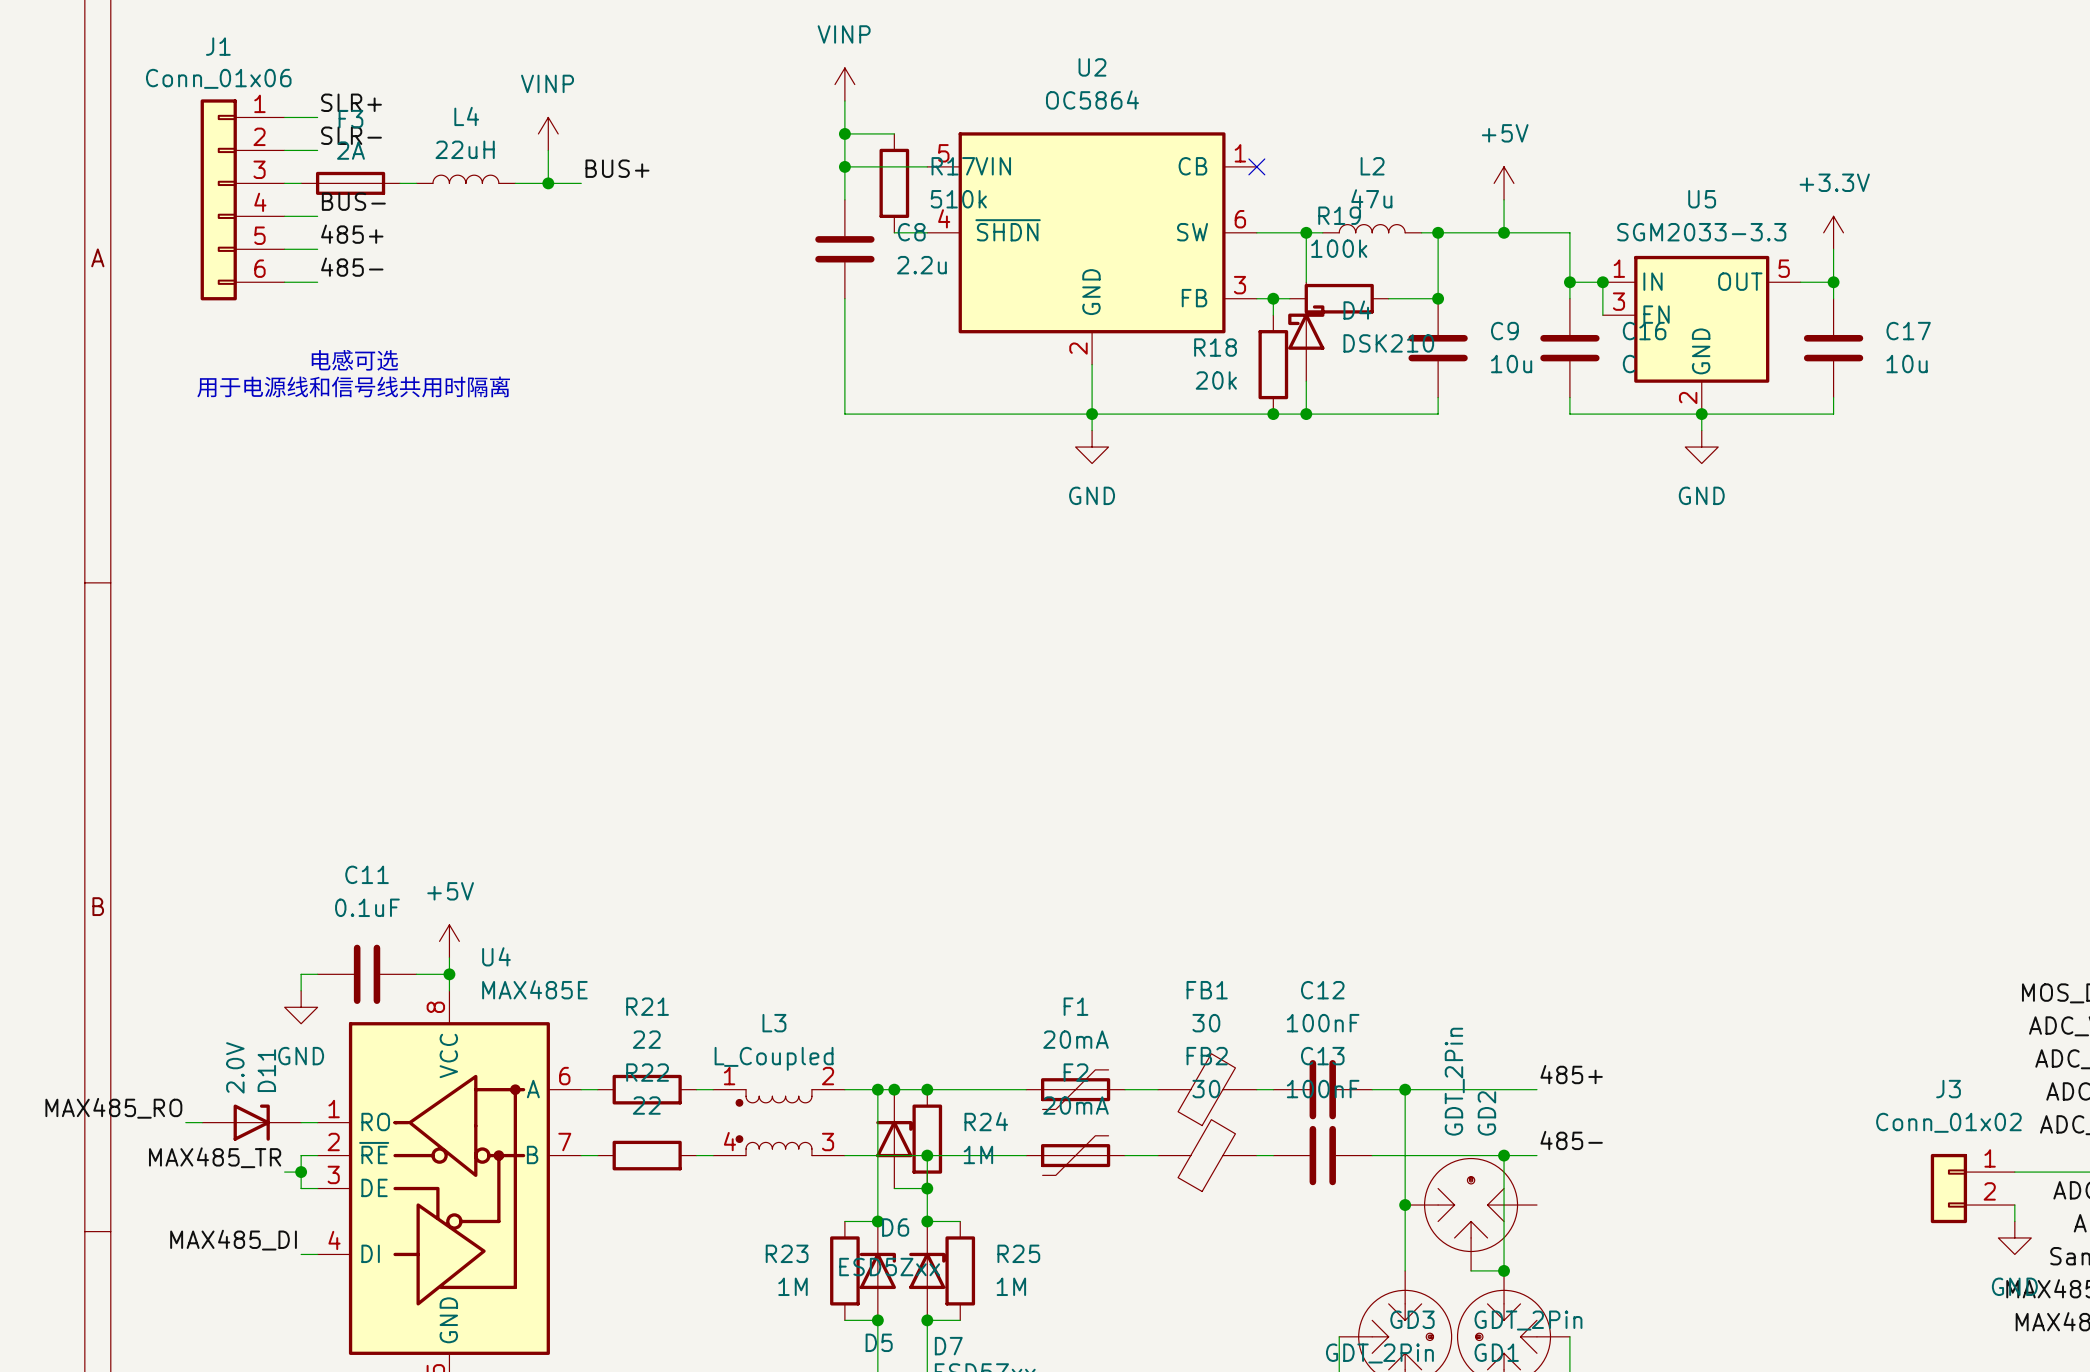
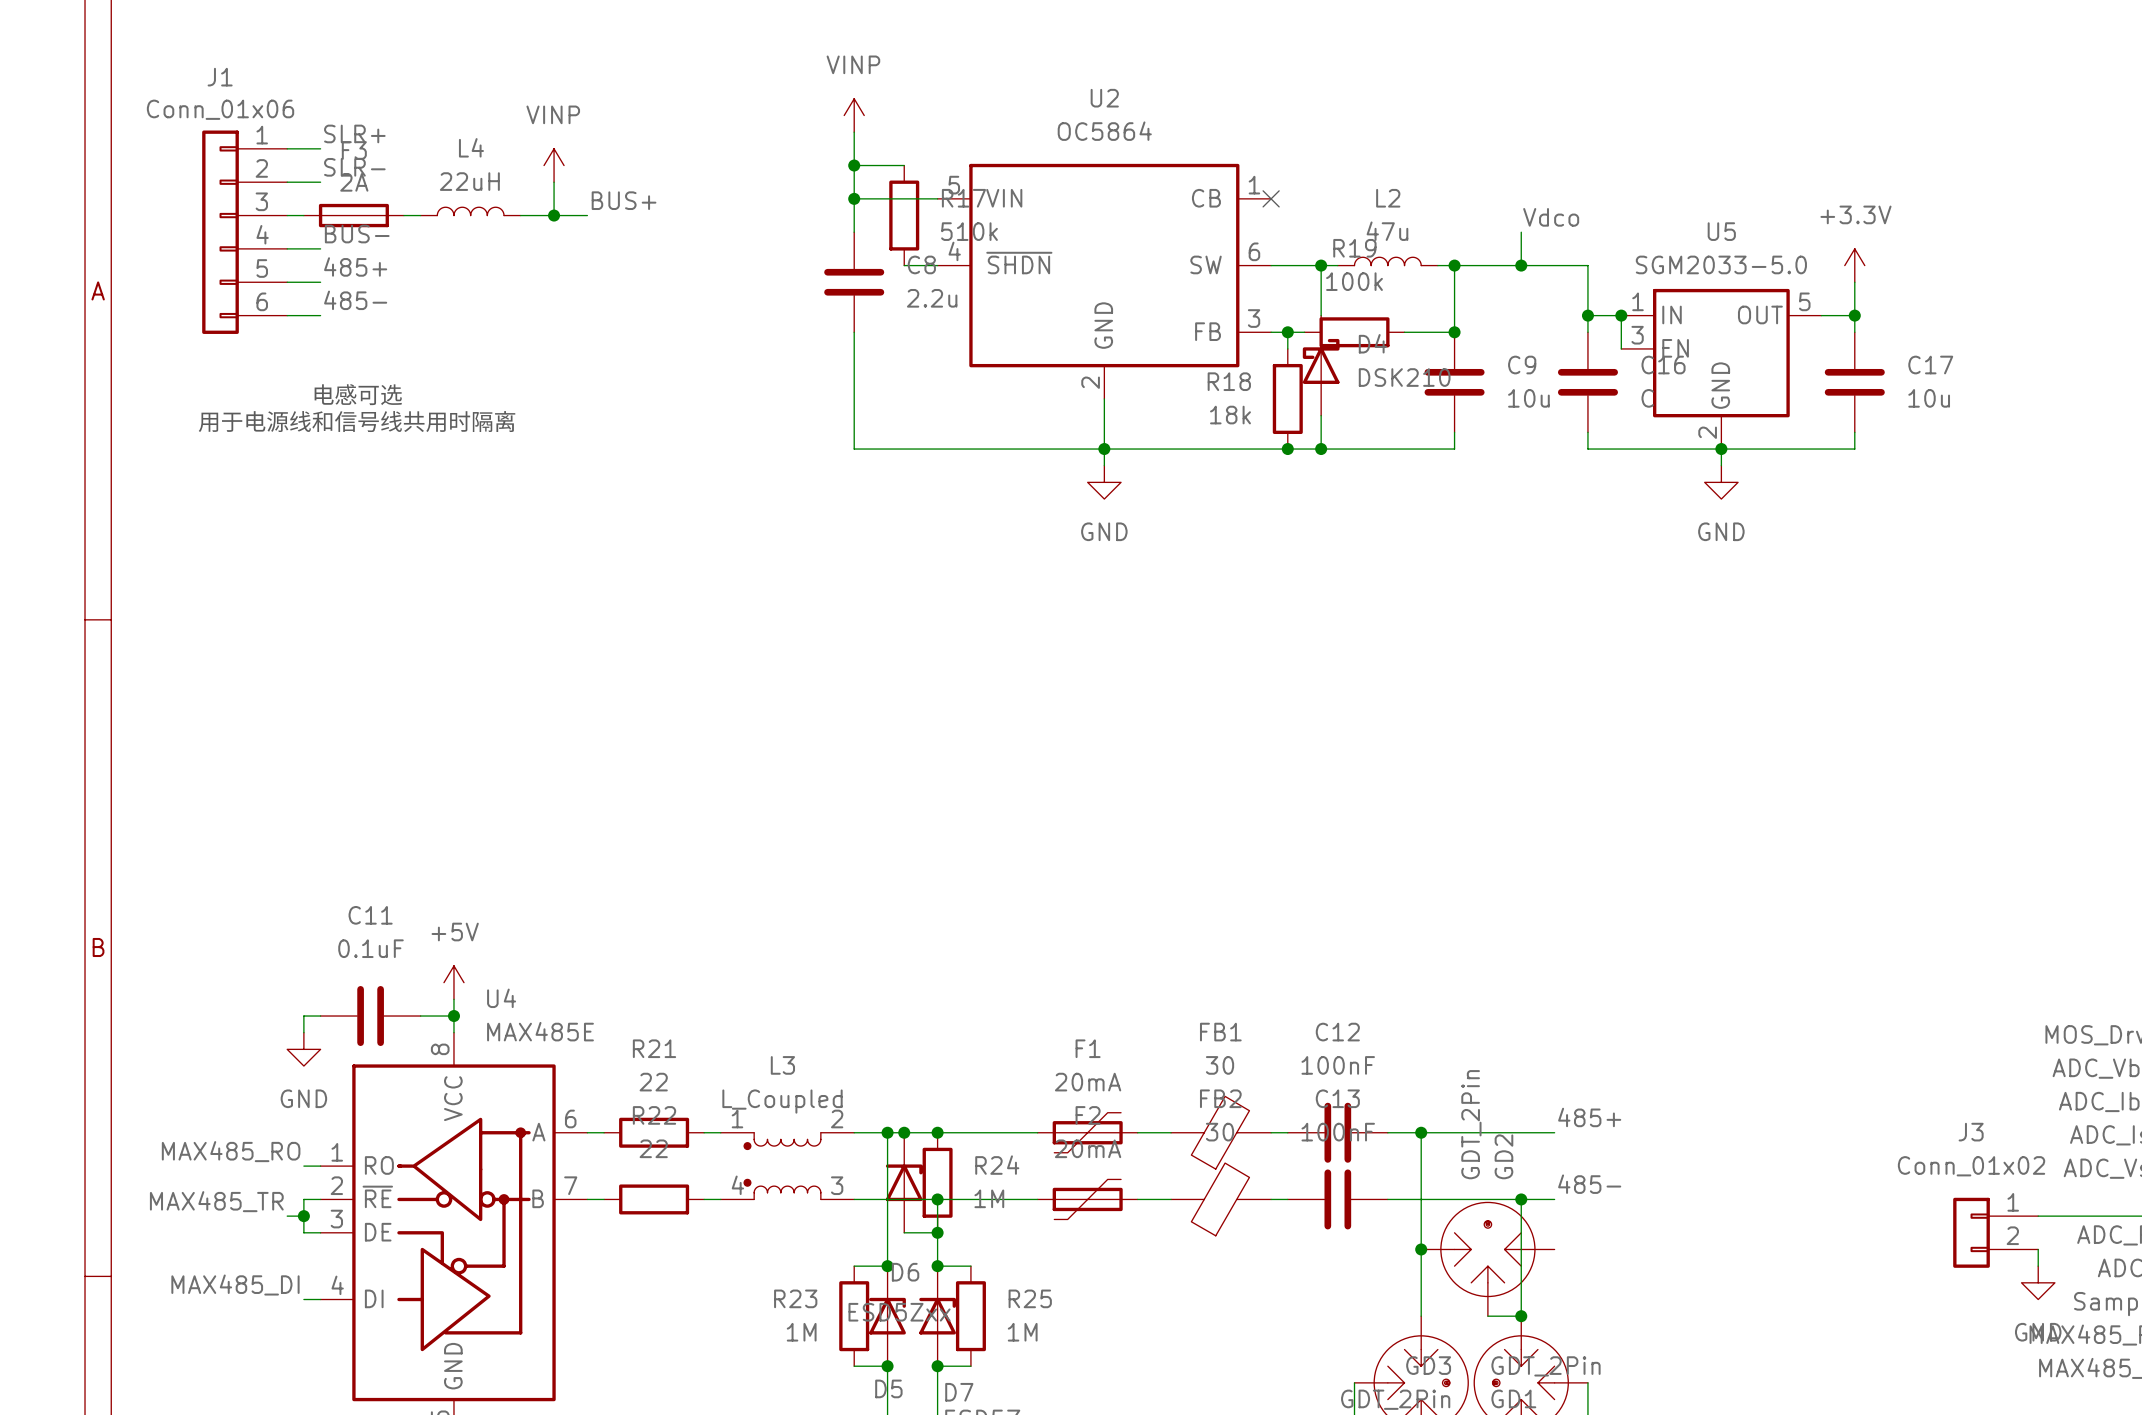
power symbol: +5V (1504, 183) -> none
label: none -> Vdco (1551, 217)
U5 value: SGM2033-3.3 (1701, 232) -> SGM2033-5.0 (1721, 264)
R18 value: 20k (1216, 380) -> 18k (1230, 415)
label position: MAX485_RO (113, 1108) -> MAX485_RO (231, 1151)
wire: (185, 1122) (202, 1122) -> none
D11: 2.0V (251, 1122) -> none

